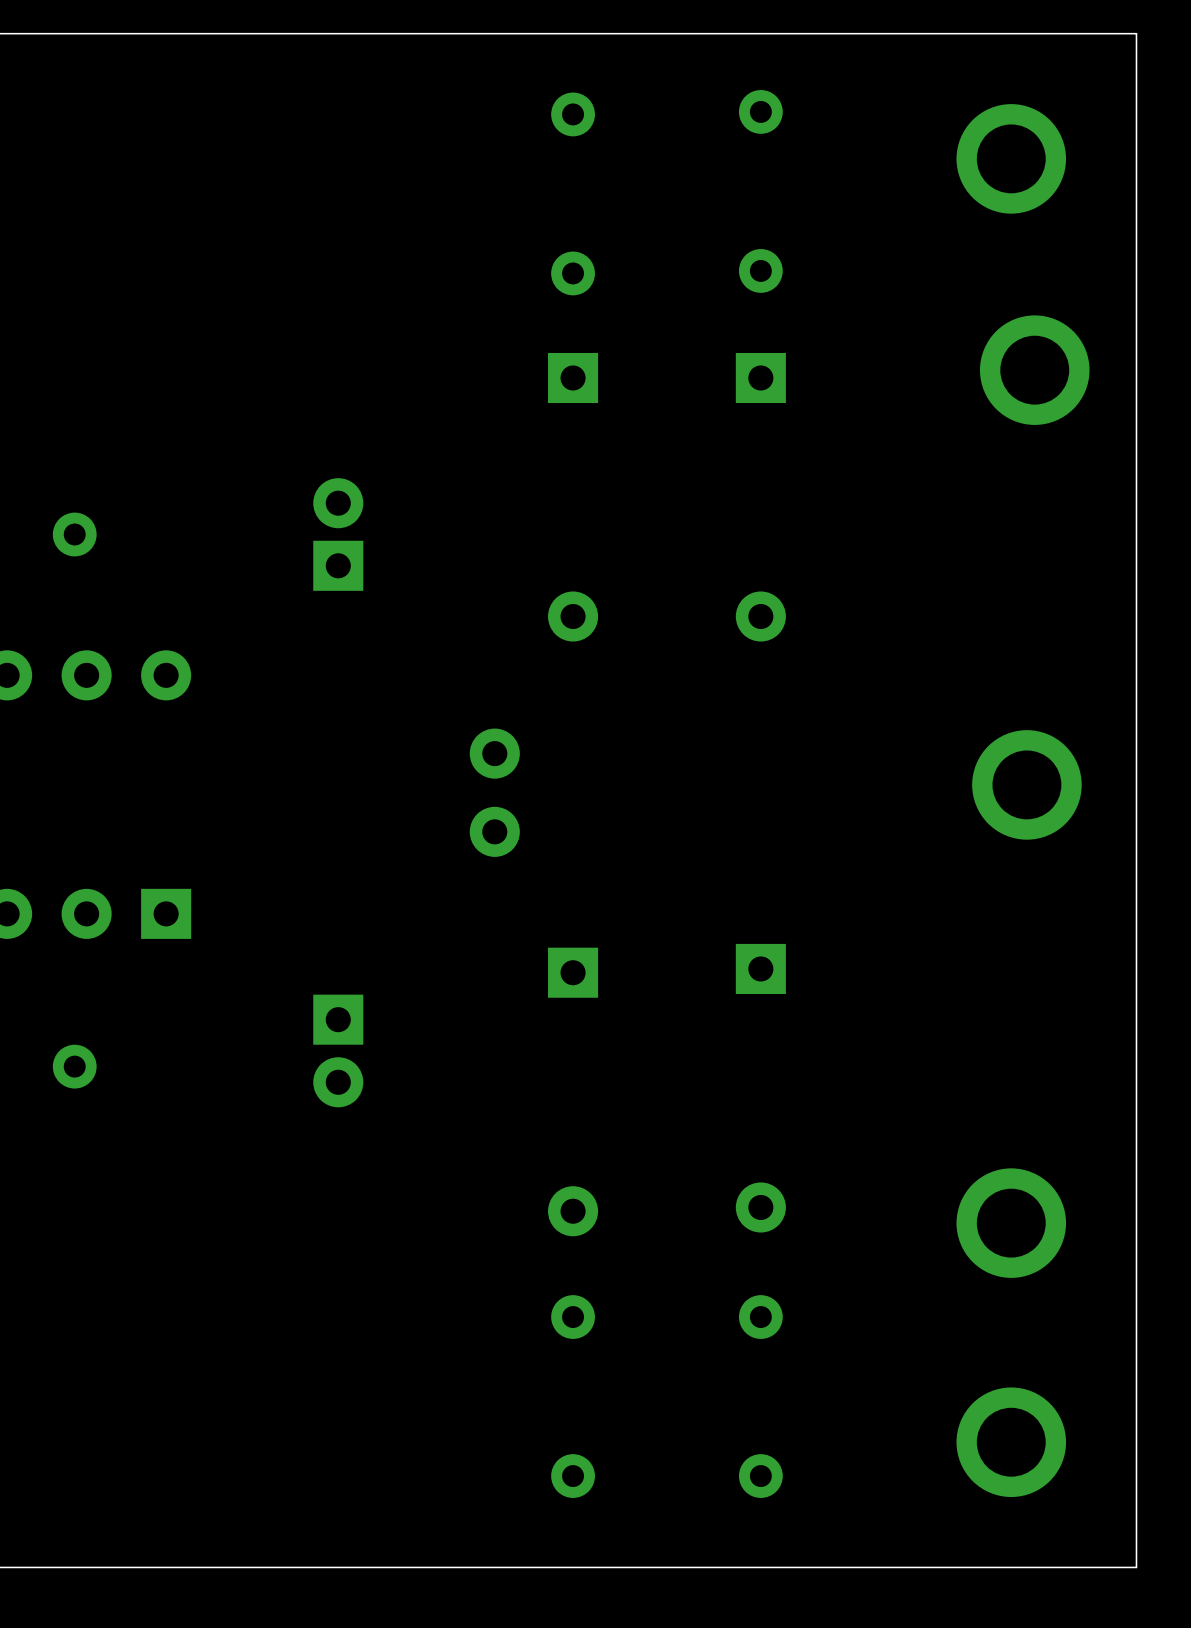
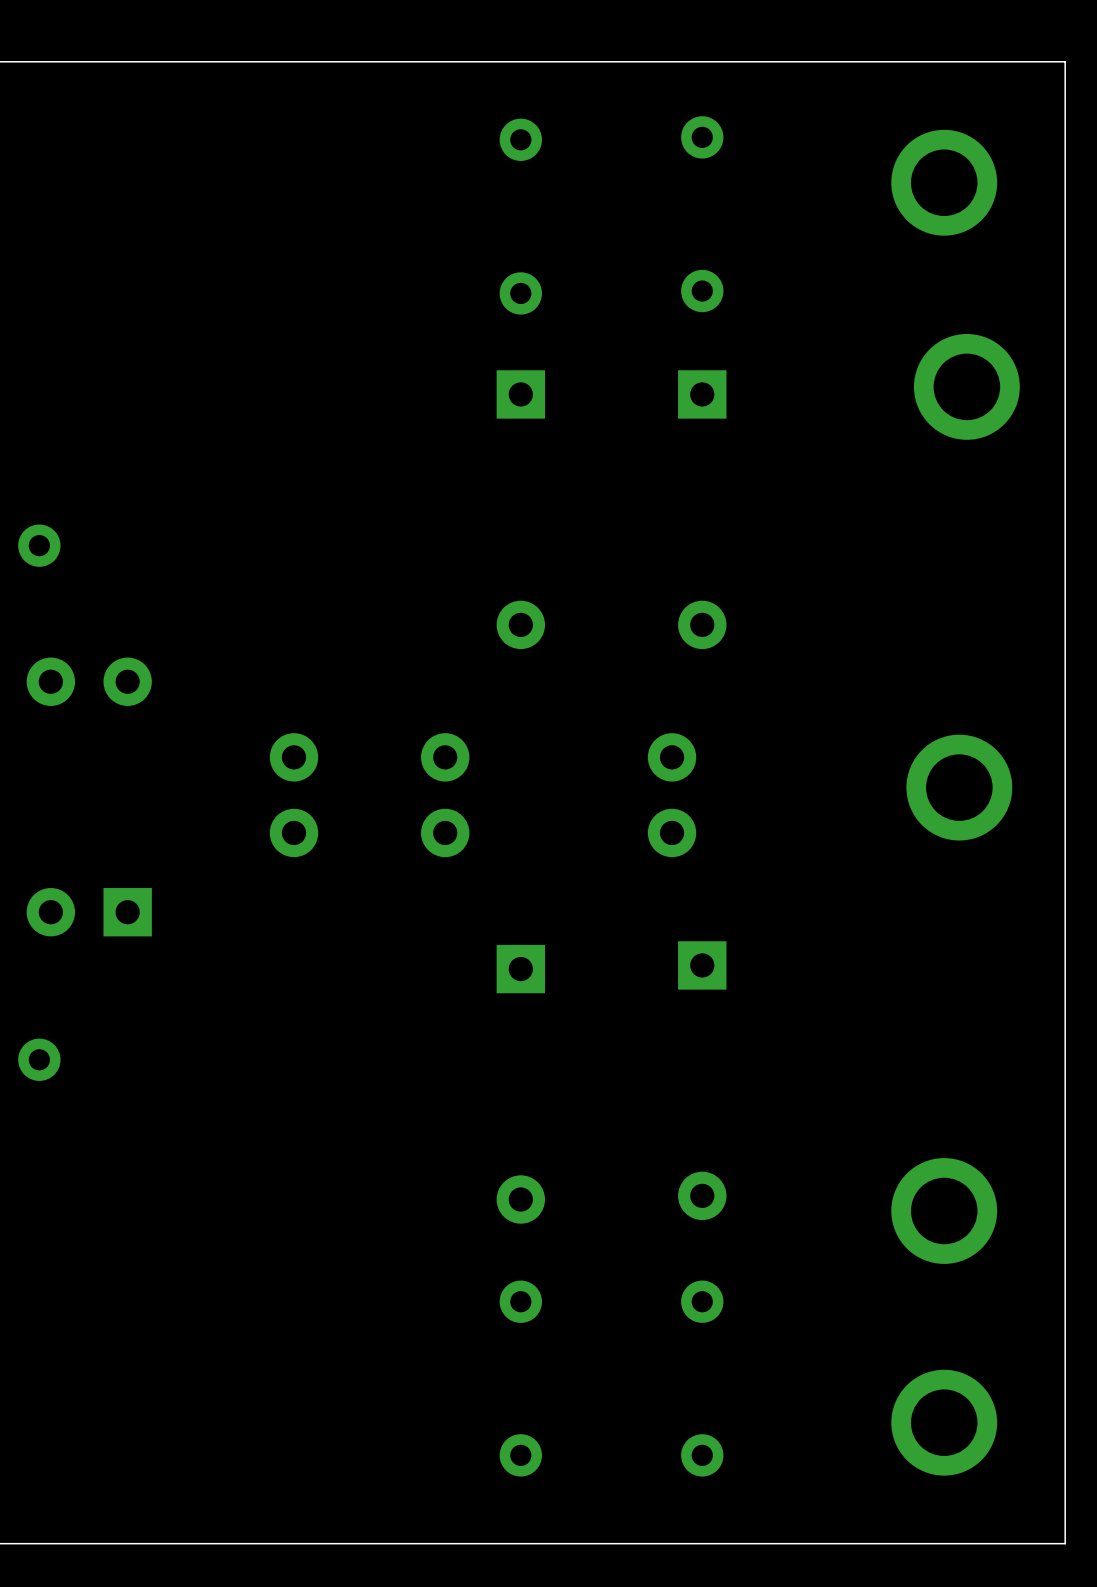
part: (338, 534) -> none
part: none -> (294, 795)
part: none -> (672, 795)
part: (338, 1050) -> none

